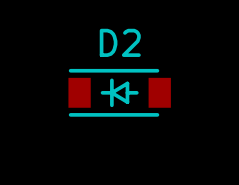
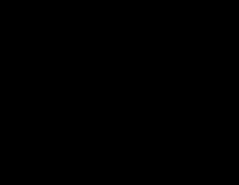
D2: (119, 92) -> none

